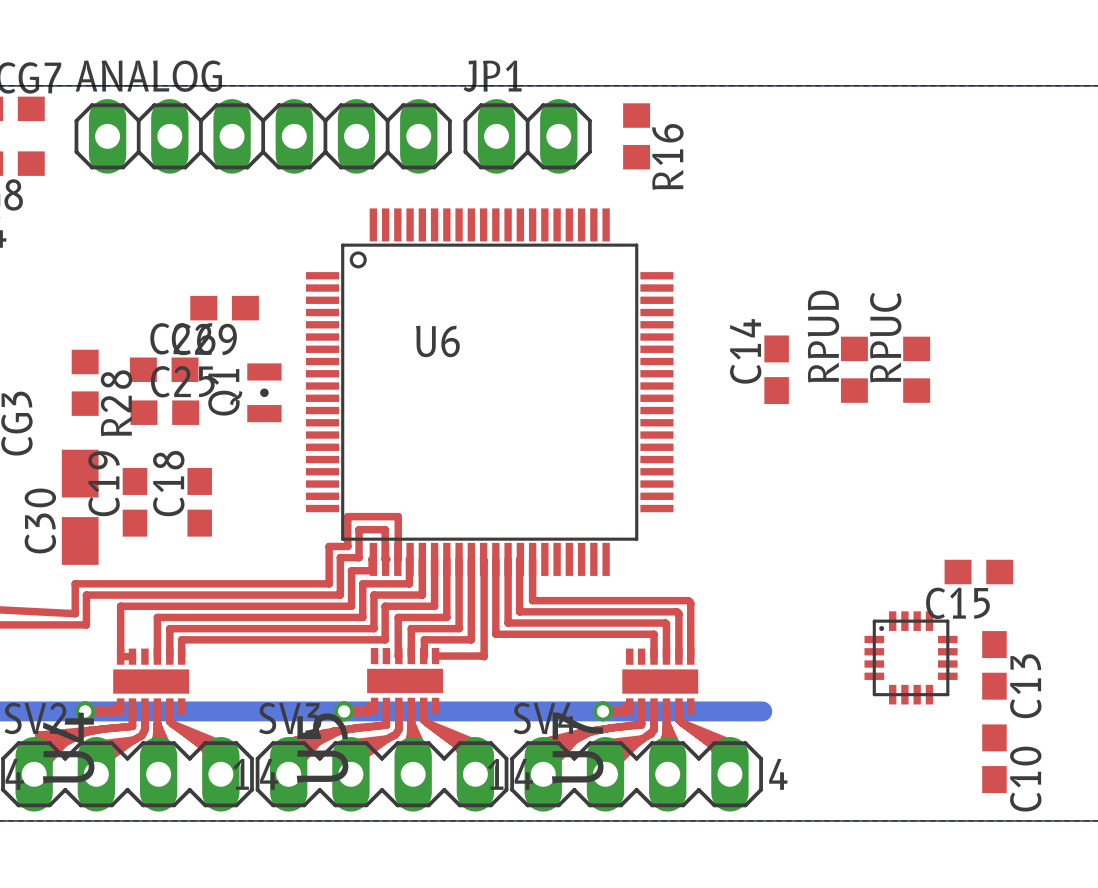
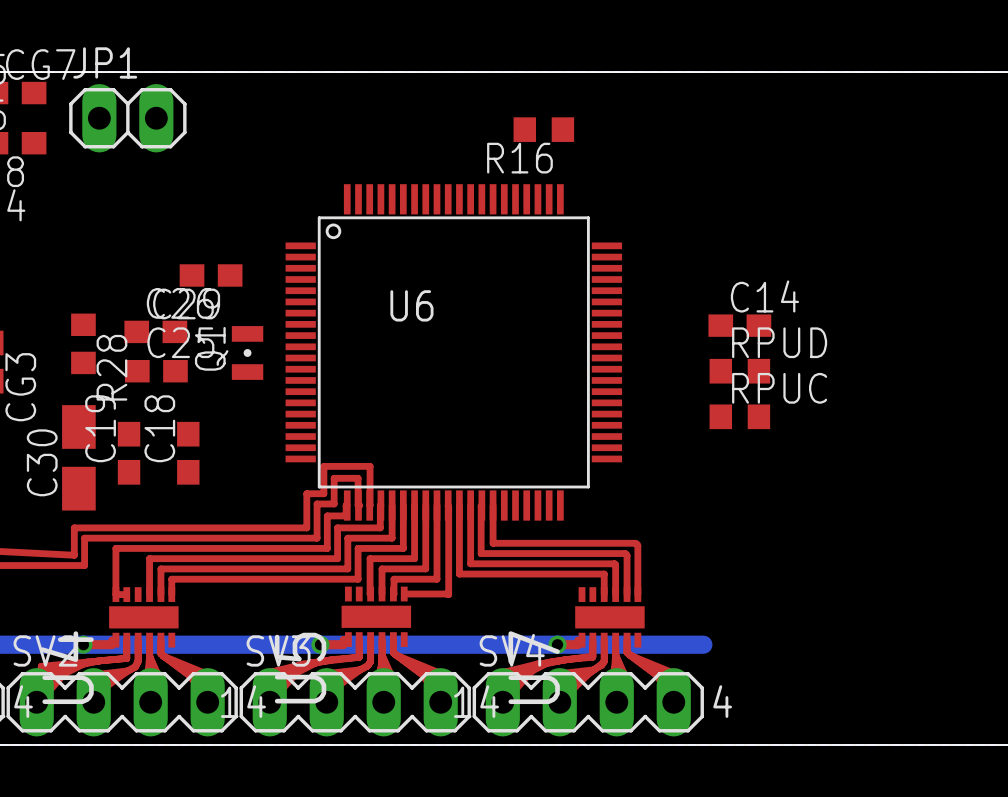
ANALOG: (263, 136) -> none
JP1 position: (527, 136) -> (127, 118)
R16 rotation: 0° (636, 136) -> 90° clockwise (543, 129)
R16 position: (636, 136) -> (543, 129)
C14 rotation: 0° (776, 369) -> 90° clockwise (739, 325)
RPUD rotation: 0° (854, 369) -> 90° clockwise (739, 371)
RPUD position: (854, 369) -> (739, 371)
RPUC rotation: 0° (916, 369) -> 90° clockwise (739, 416)
RPUC position: (916, 369) -> (739, 416)
C15: (978, 572) -> none
part: (911, 657) -> none
C13: (994, 665) -> none
C10: (994, 758) -> none

